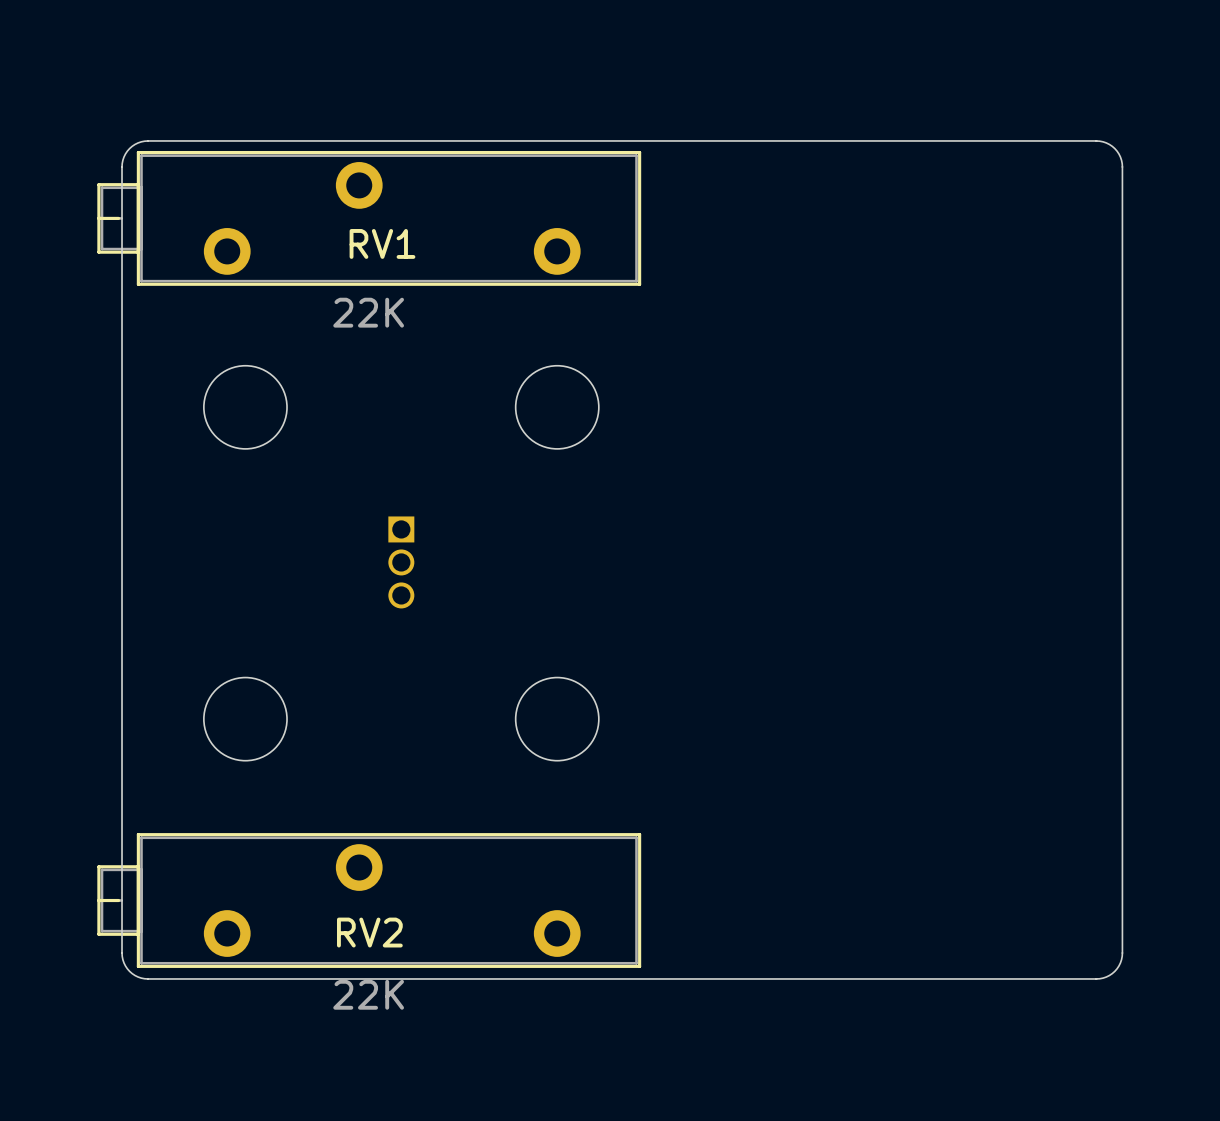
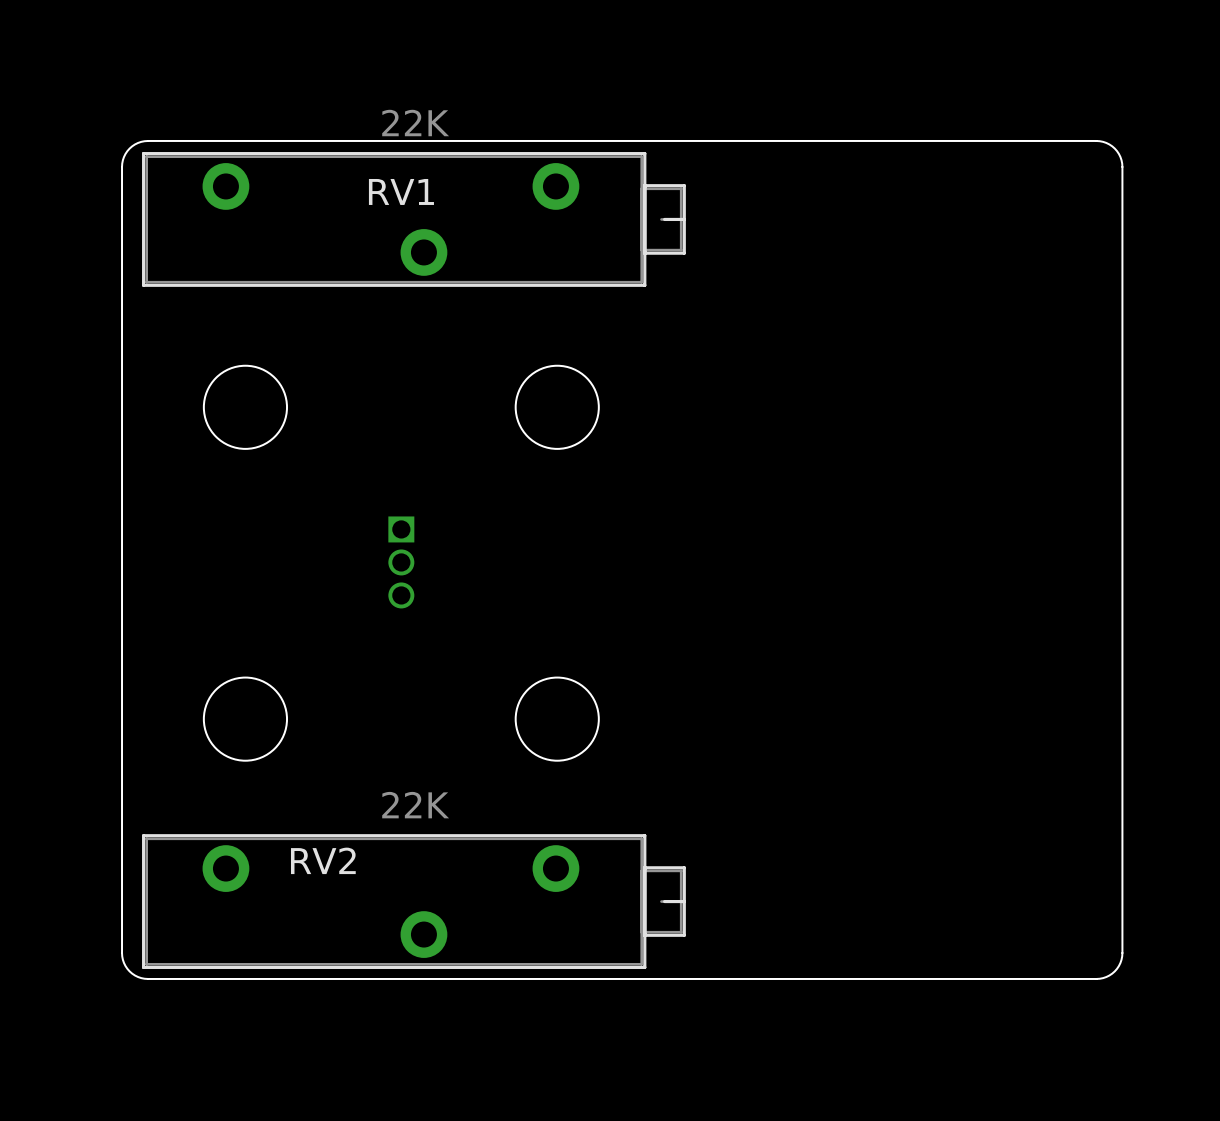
RV1 rotation: 0° (369, 218) -> 180° (413, 219)
RV2 rotation: 0° (369, 900) -> 180° (413, 901)
RV2 name position: RV2 (369, 932) -> RV2 (323, 860)

